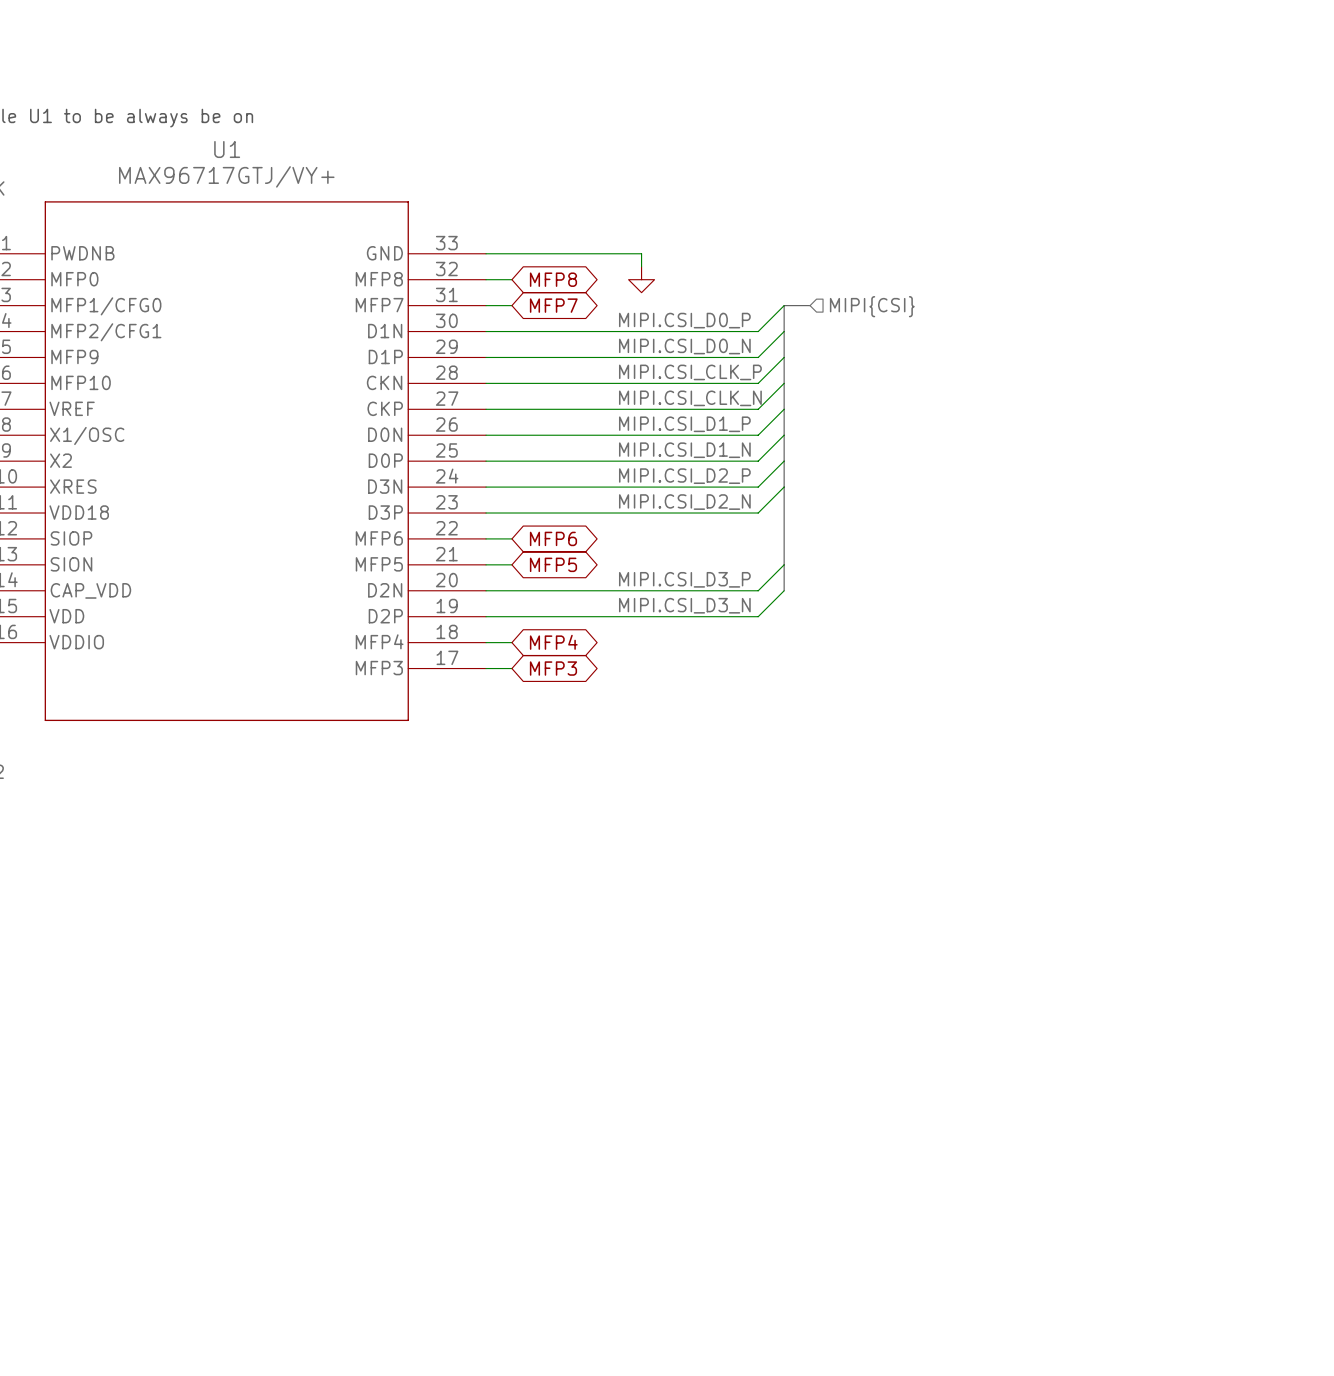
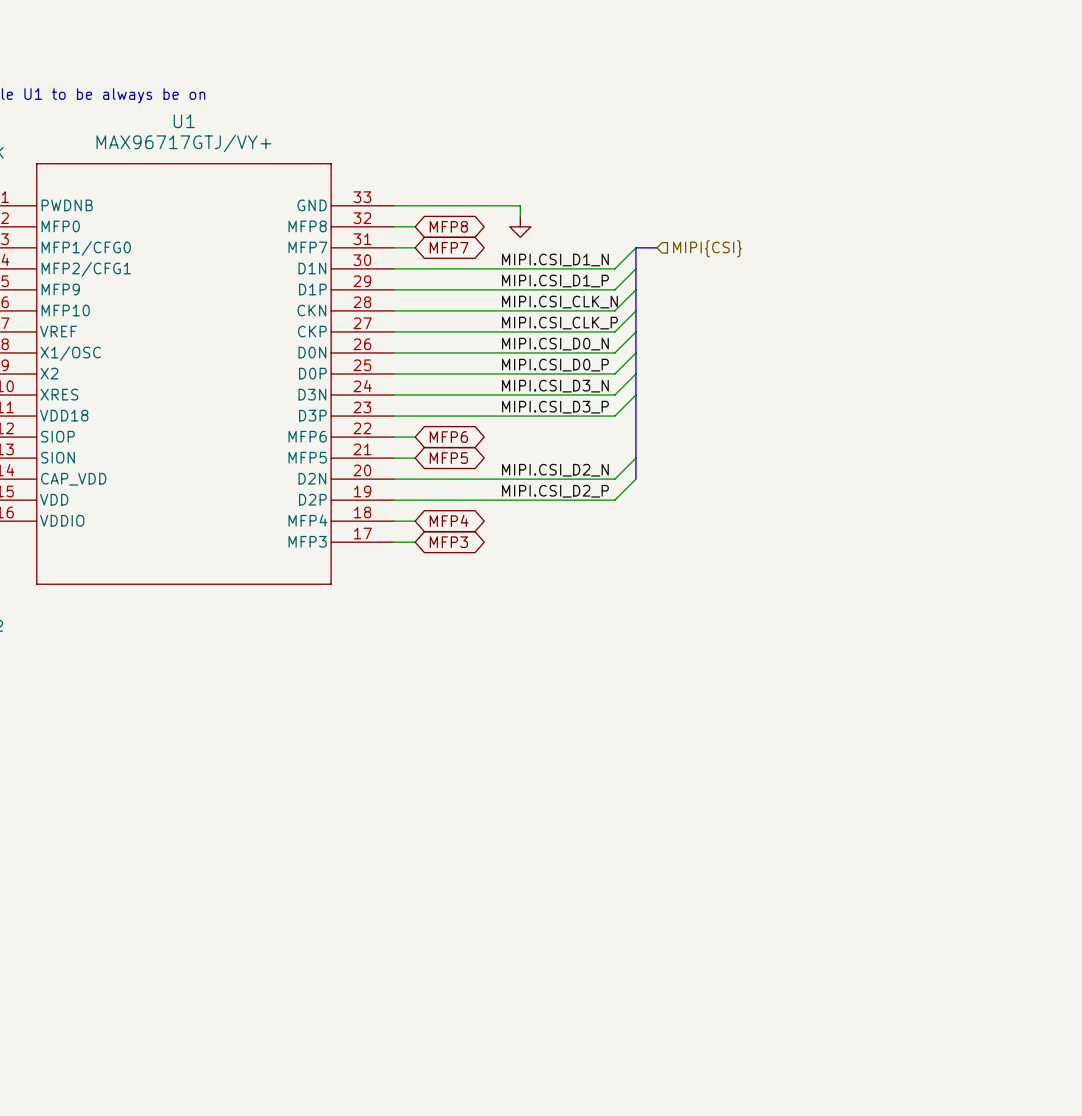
label: MIPI.CSI_D0_P (684, 320) -> MIPI.CSI_D1_N (555, 260)
label: MIPI.CSI_D0_N (684, 346) -> MIPI.CSI_D1_P (555, 281)
label: MIPI.CSI_CLK_P (690, 372) -> MIPI.CSI_CLK_N (559, 302)
label: MIPI.CSI_CLK_N (690, 398) -> MIPI.CSI_CLK_P (559, 323)
label: MIPI.CSI_D1_P (684, 424) -> MIPI.CSI_D0_N (555, 344)
label: MIPI.CSI_D1_N (684, 450) -> MIPI.CSI_D0_P (555, 365)
label: MIPI.CSI_D2_P (684, 476) -> MIPI.CSI_D3_N (555, 386)
label: MIPI.CSI_D2_N (684, 502) -> MIPI.CSI_D3_P (555, 407)
label: MIPI.CSI_D3_P (684, 579) -> MIPI.CSI_D2_N (555, 470)
label: MIPI.CSI_D3_N (684, 605) -> MIPI.CSI_D2_P (555, 491)

